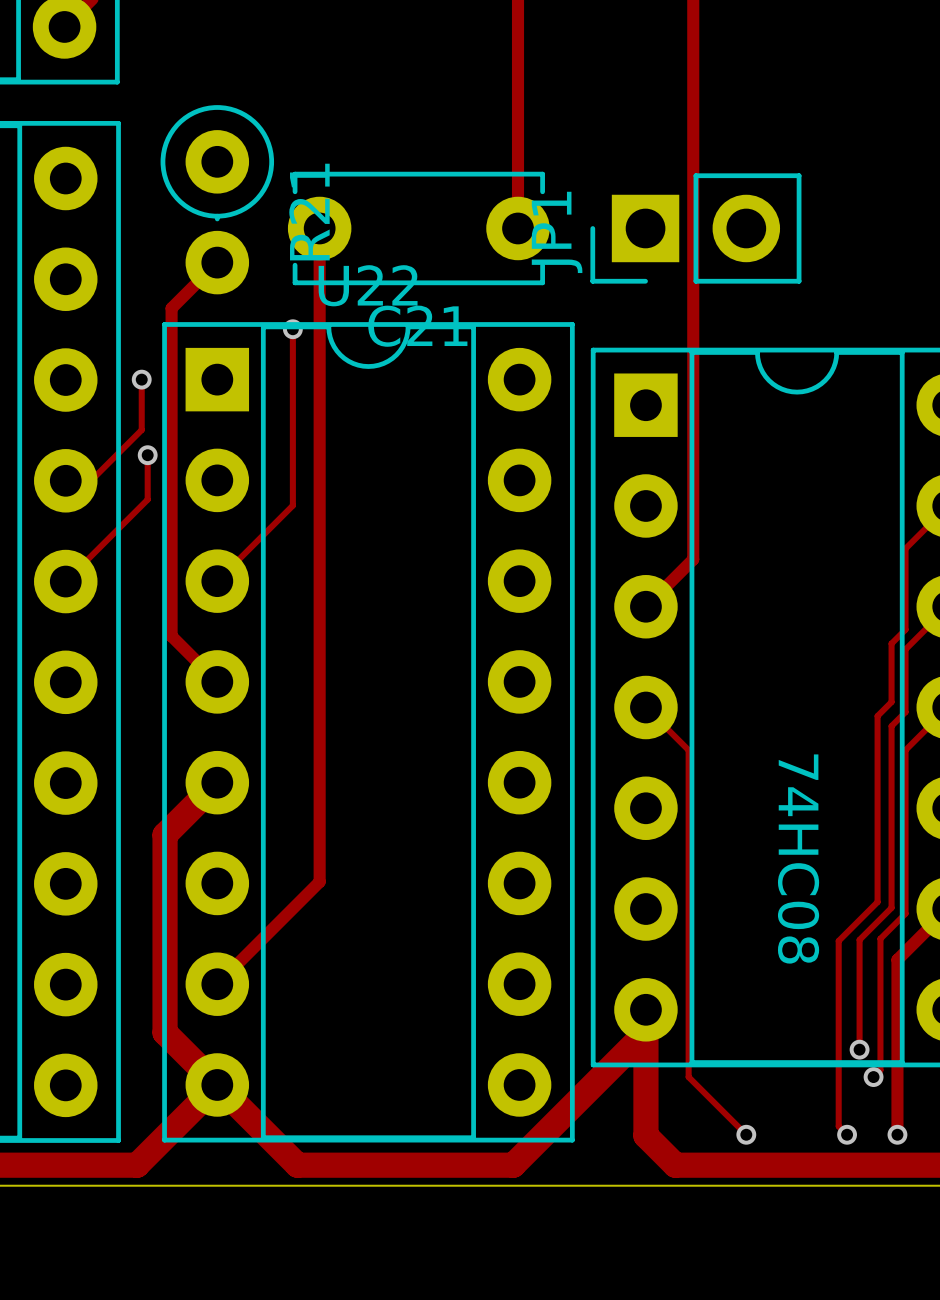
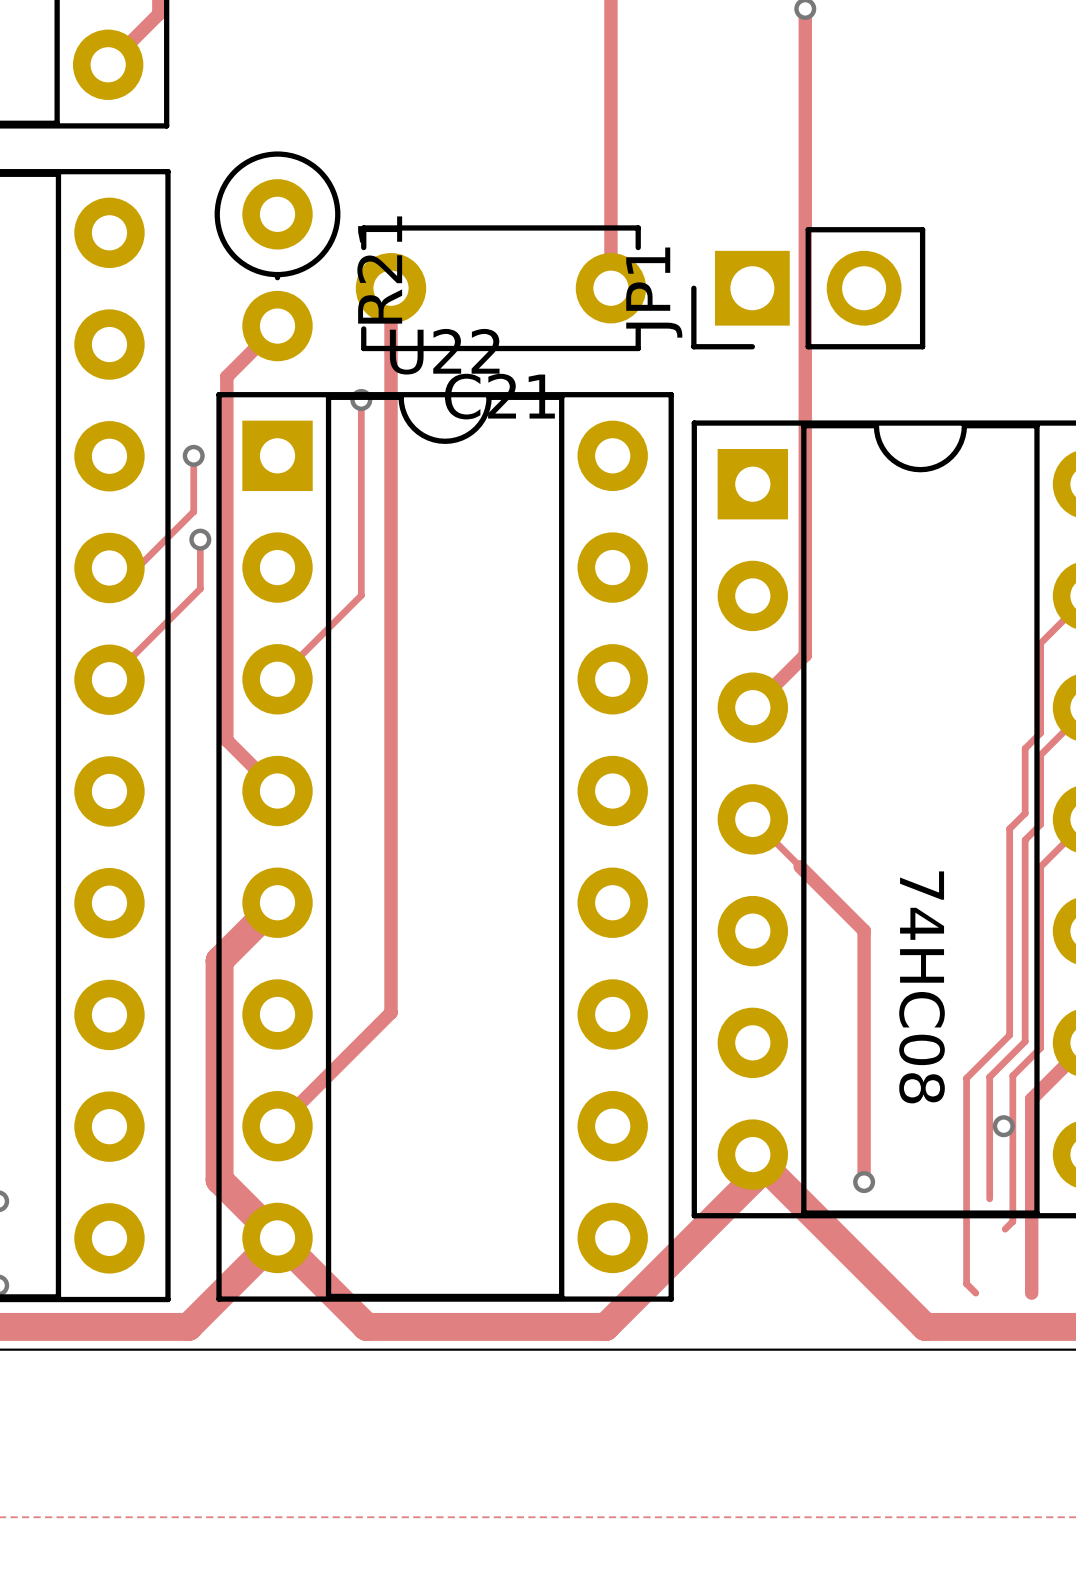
track: (688, 750) (688, 1077) (746, 1134) -> (800, 866) (864, 930) (864, 1182)
via: none -> (1003, 1126)
track: (645, 1032) (645, 1135) (675, 1165) (801, 1165) -> (752, 1154) (925, 1326)
via: none -> (864, 1182)
via: (859, 1049) -> none
via: (873, 1077) -> none
via: (746, 1134) -> none
via: (847, 1134) -> none
via: (897, 1134) -> none

